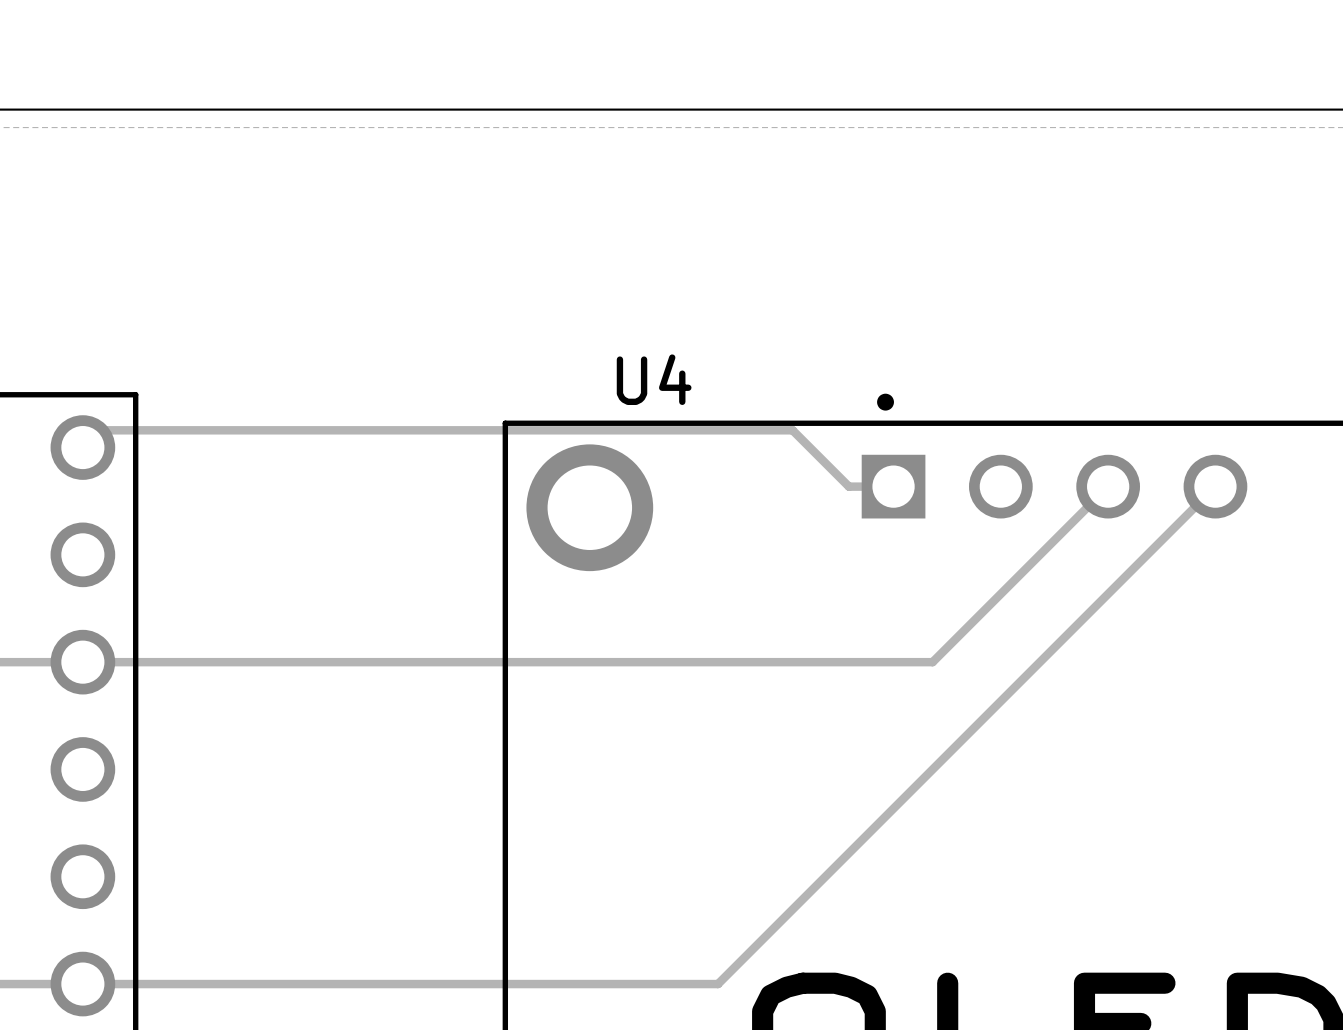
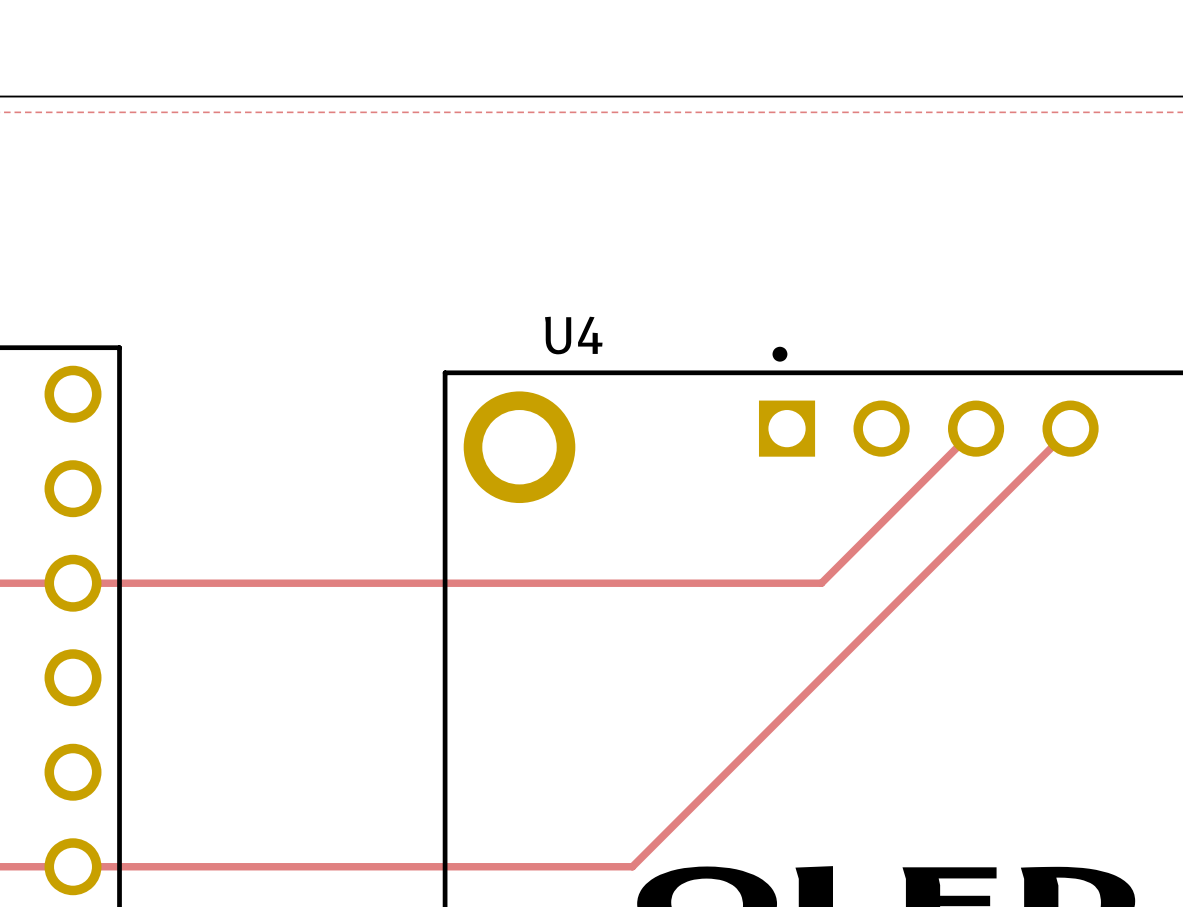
track: (82, 447) (100, 430) (792, 430) (848, 486) (893, 486) -> none

